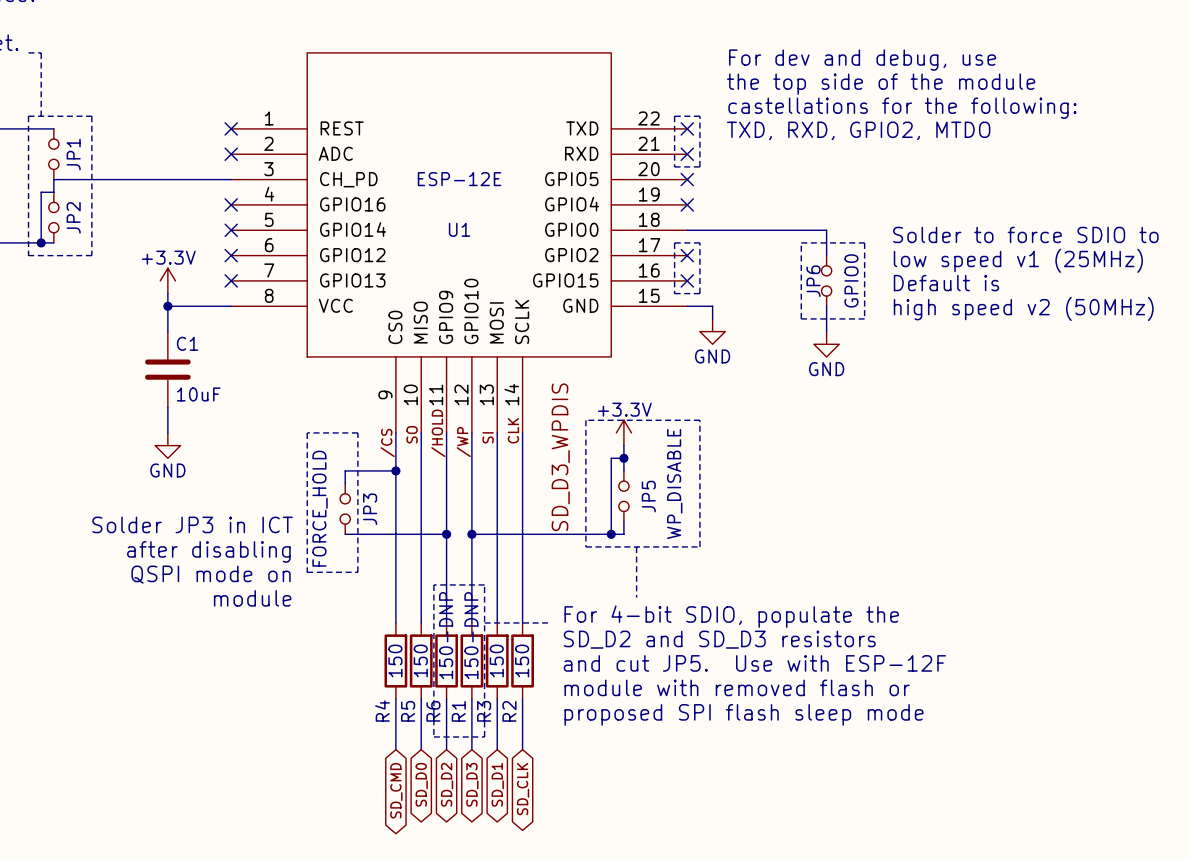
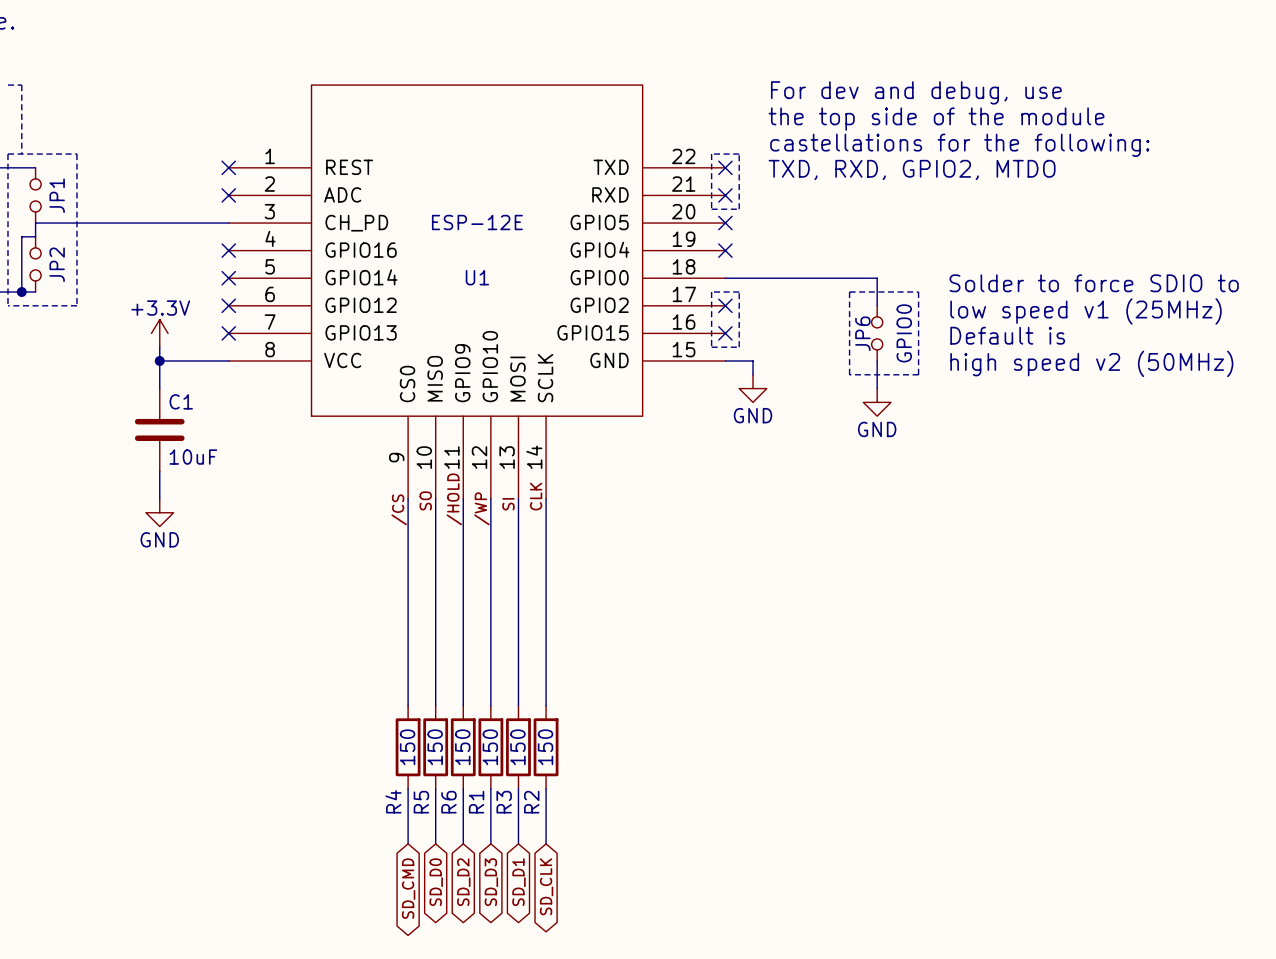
line: (585, 420) (699, 420) (699, 546) (585, 546) (585, 420) -> none
line: (307, 432) (307, 572) (357, 572) (357, 432) (307, 432) -> none
power symbol: +3.3V (623, 432) -> none
wire: (623, 445) (623, 470) -> none
label: SD_D3_WPDIS (560, 457) -> none
wire: (623, 458) (611, 458) (611, 534) -> none
junction: (623, 458) -> none
wire: (395, 470) (345, 470) (345, 483) -> none
junction: (395, 470) -> none
JP5: WP_DISABLE (623, 496) -> none
JP3: FORCE_HOLD (345, 508) -> none
wire: (623, 521) (623, 534) (471, 534) -> none
text: Solder JP3 in ICT (192, 524) -> none
wire: (345, 534) (446, 534) -> none
junction: (446, 534) -> none
junction: (471, 534) -> none
junction: (611, 534) -> none
line: (636, 546) (636, 597) -> none
text: after disabling (208, 551) -> none
text: QSPI mode on (211, 574) -> none
line: (433, 584) (433, 736) (484, 736) (484, 584) (433, 584) -> none
text: module (252, 598) -> none
text: For 4-bit SDIO, populate the (731, 616) -> none
line: (484, 622) (547, 622) -> none
R6 value: 150-DNP (446, 635) -> 150 (462, 747)
R1 value: 150-DNP (471, 635) -> 150 (490, 747)
text: SD_D2 and SD_D3 resistors (719, 639) -> none
text: and cut JP5. Use with ESP-12F (754, 663) -> none
text: module with removed flash or (737, 687) -> none
text: proposed SPI flash sleep mode (744, 714) -> none

